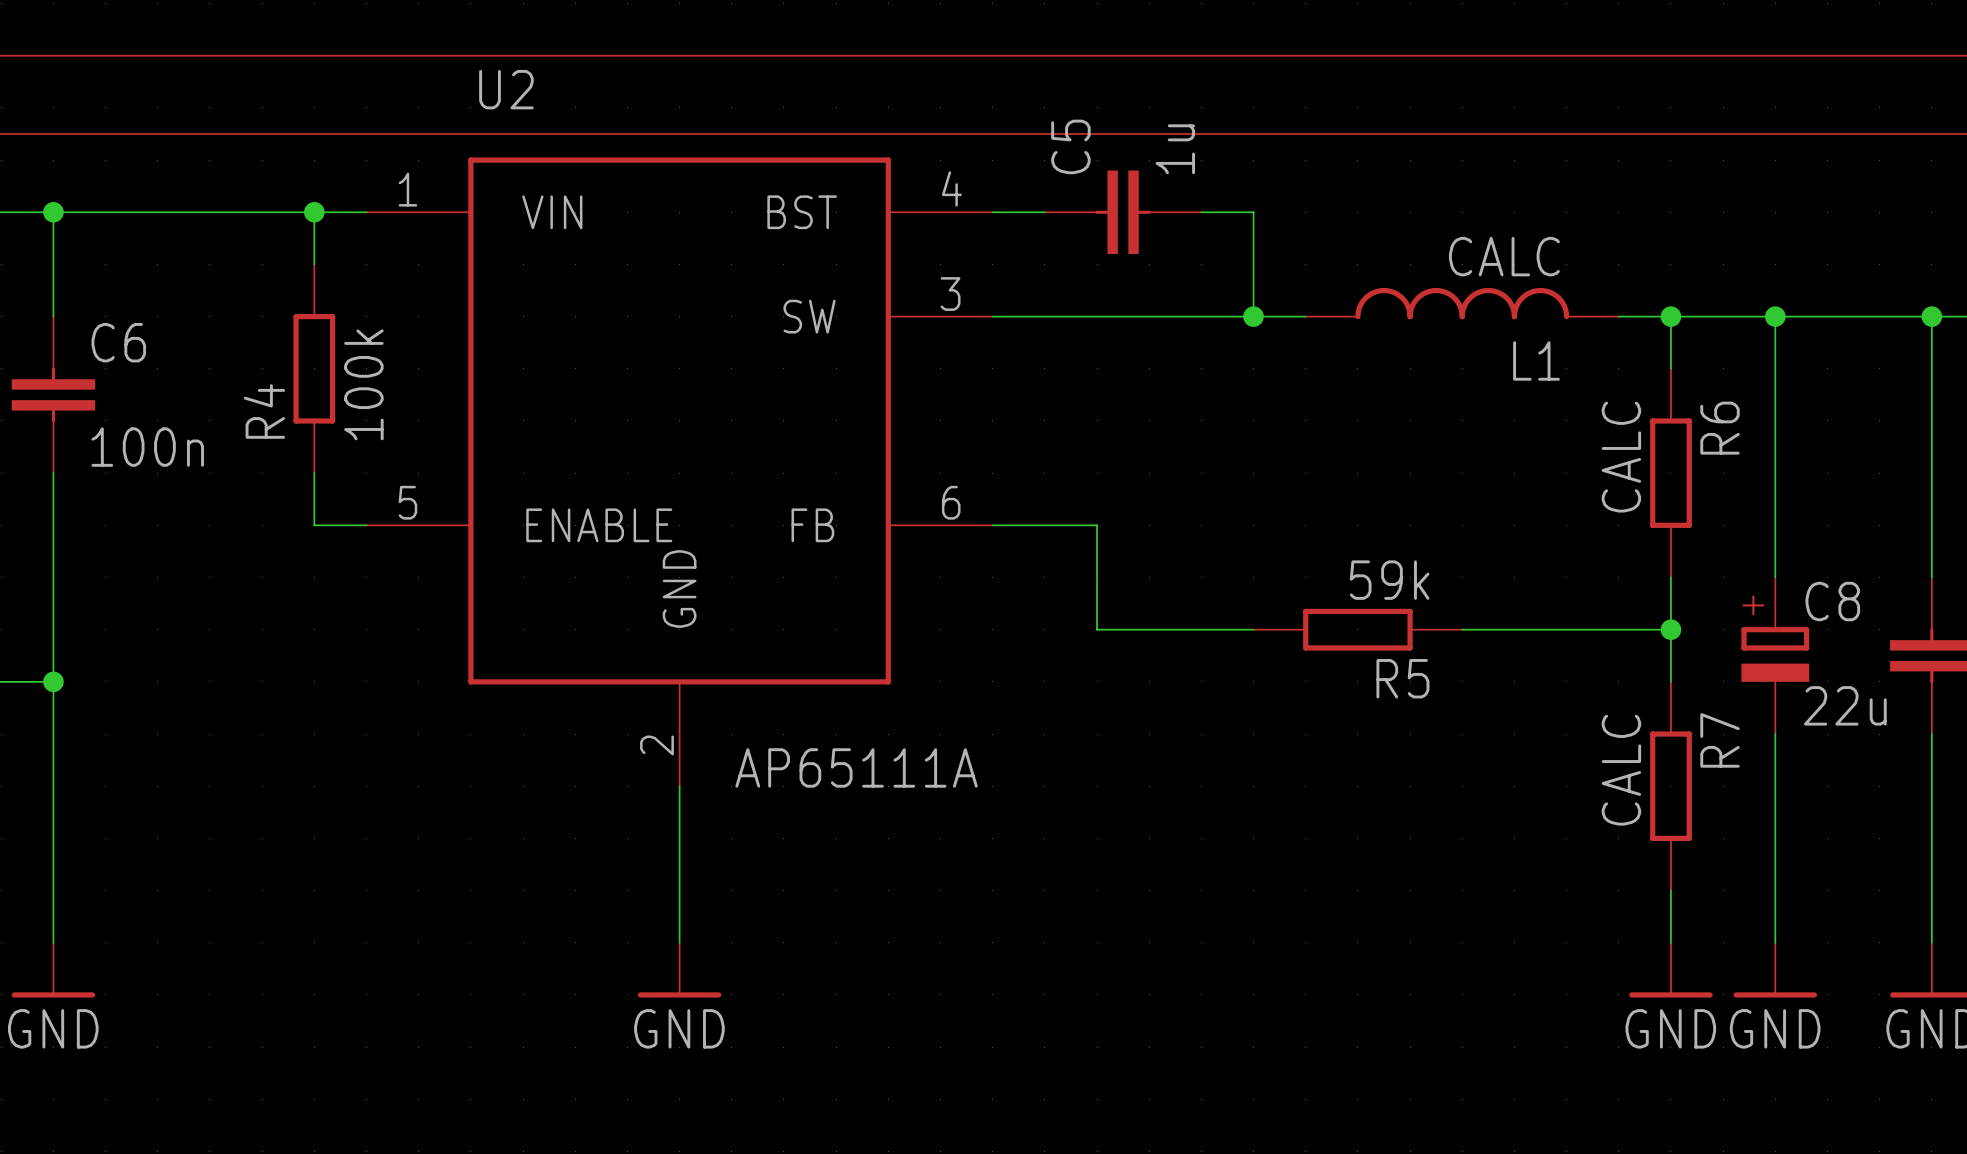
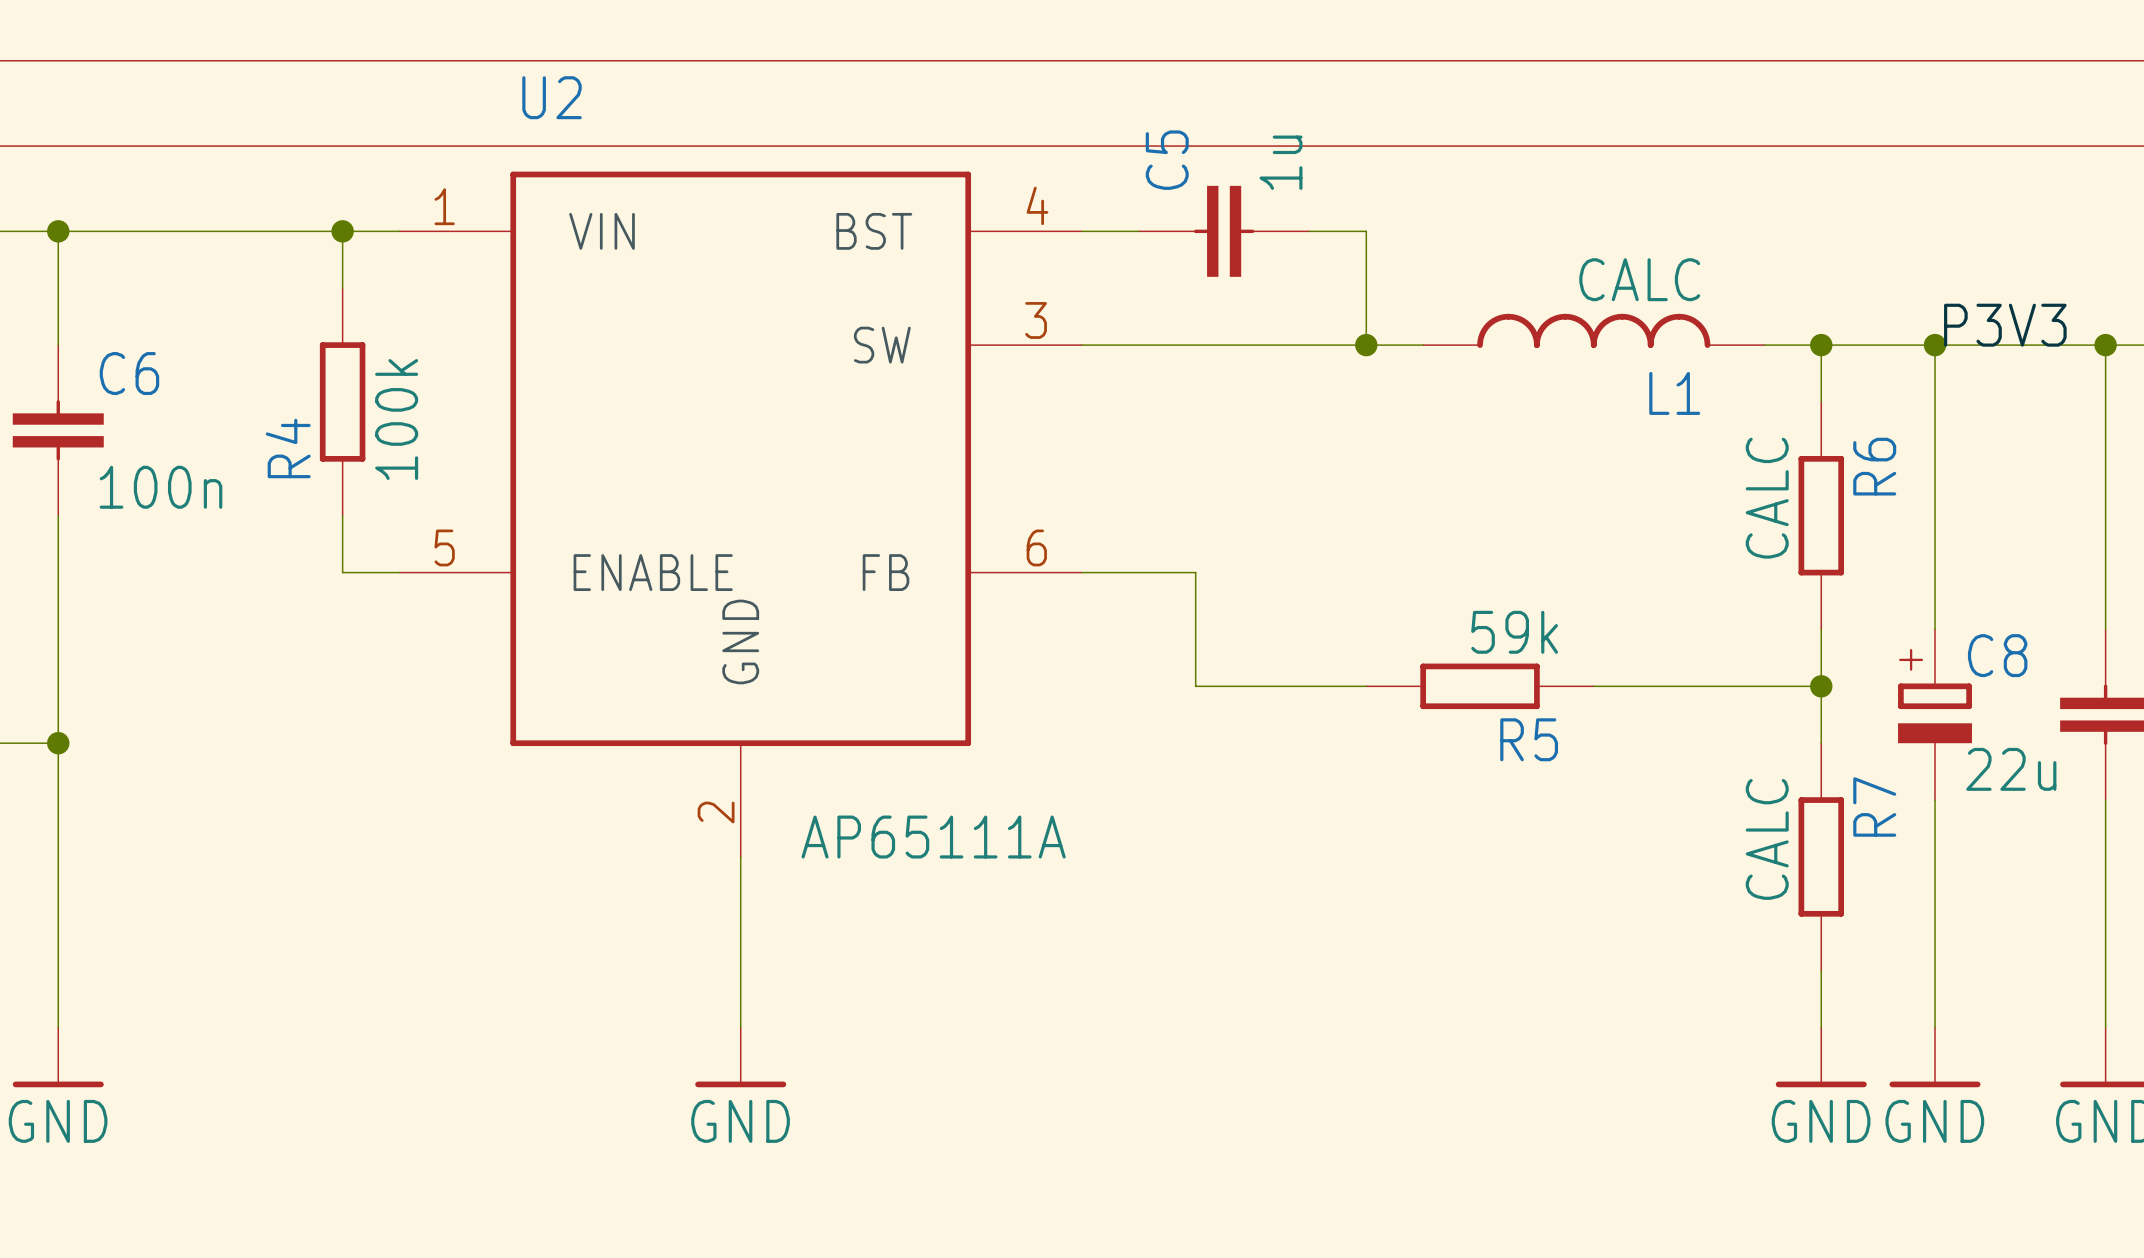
label: none -> P3V3 (2005, 325)

